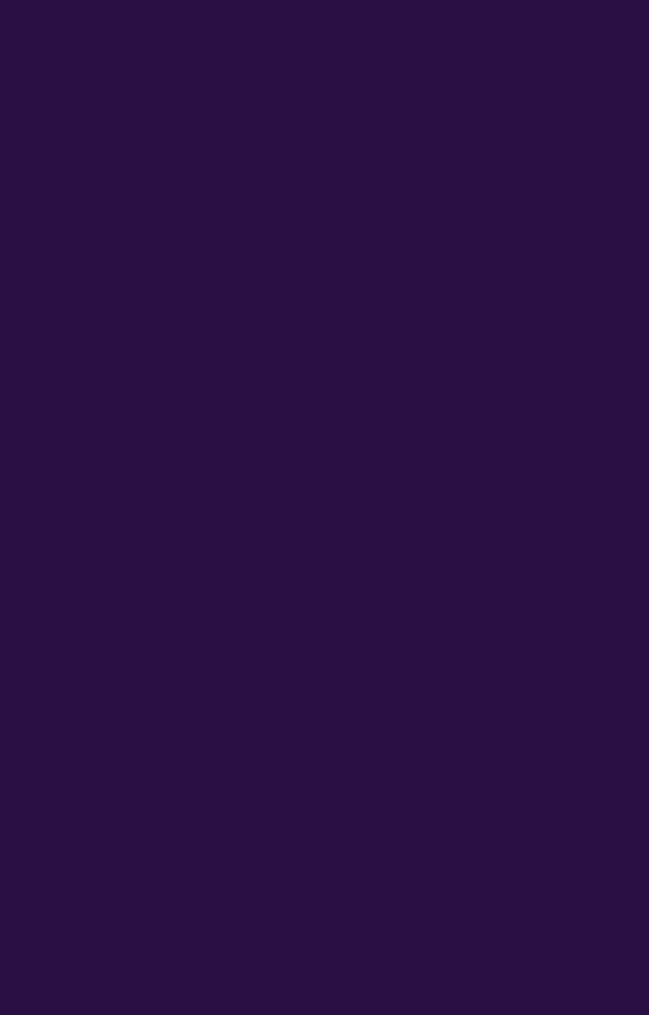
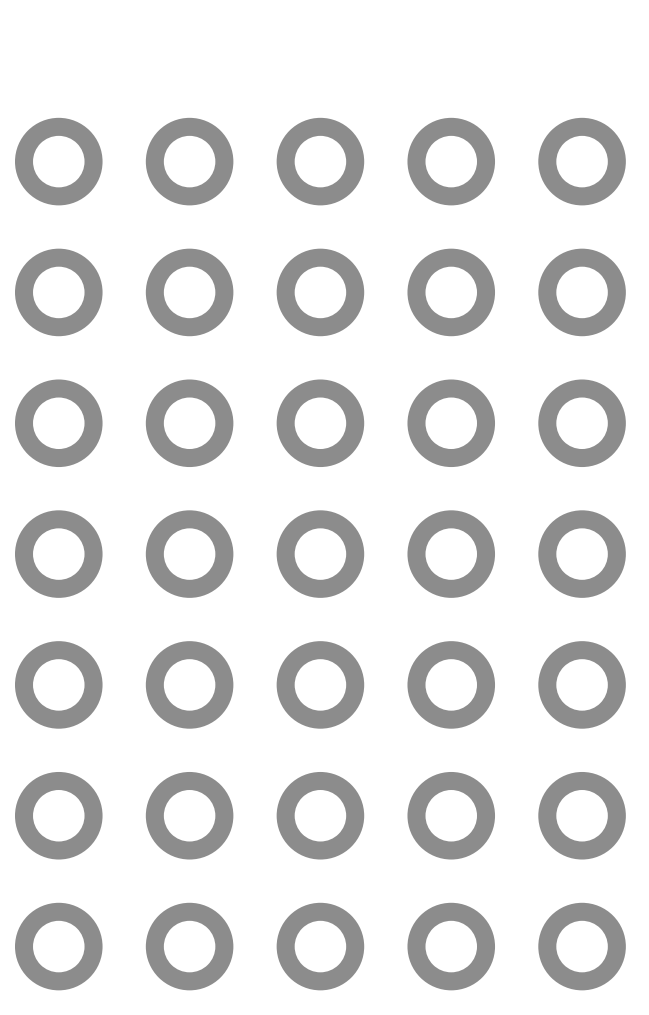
part: none -> (58, 161)
part: none -> (189, 161)
part: none -> (320, 161)
part: none -> (451, 161)
part: none -> (582, 161)
part: none -> (58, 292)
part: none -> (189, 292)
part: none -> (320, 292)
part: none -> (451, 292)
part: none -> (582, 292)
part: none -> (58, 423)
part: none -> (189, 423)
part: none -> (320, 423)
part: none -> (451, 423)
part: none -> (582, 423)
part: none -> (58, 554)
part: none -> (189, 554)
part: none -> (320, 554)
part: none -> (451, 554)
part: none -> (582, 554)
part: none -> (58, 684)
part: none -> (189, 684)
part: none -> (320, 684)
part: none -> (451, 684)
part: none -> (582, 684)
part: none -> (58, 815)
part: none -> (189, 815)
part: none -> (320, 815)
part: none -> (451, 815)
part: none -> (582, 815)
part: none -> (58, 946)
part: none -> (189, 946)
part: none -> (320, 946)
part: none -> (451, 946)
part: none -> (582, 946)

